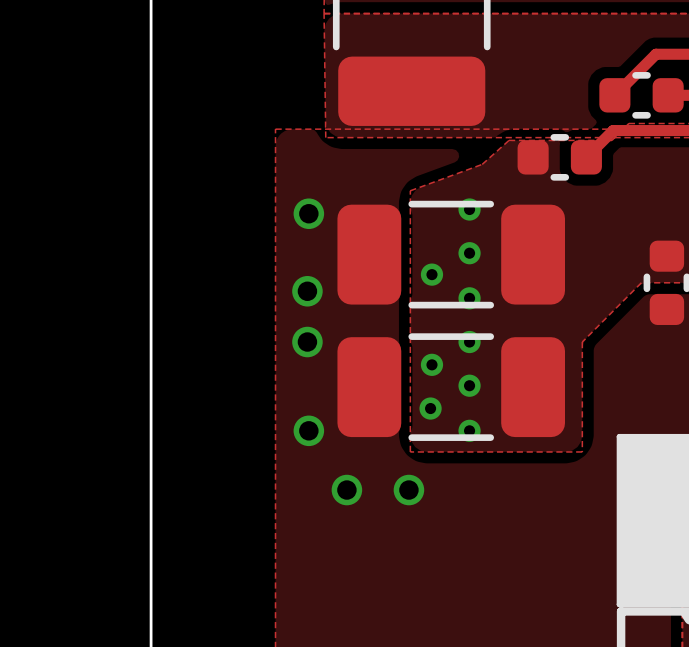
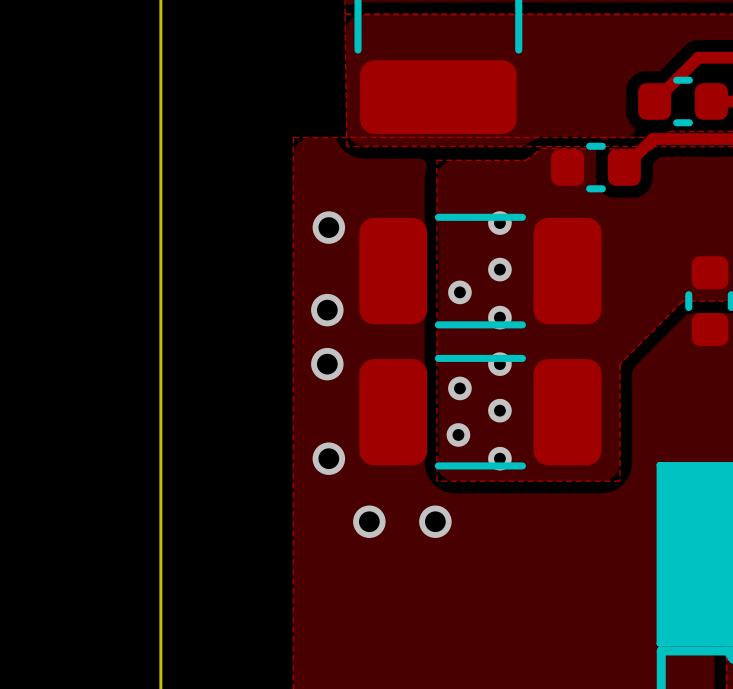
zone outline: (611, 140) (509, 140) (482, 164) (410, 190) -> (651, 149) (541, 148) (525, 160) (436, 160) (436, 203)

